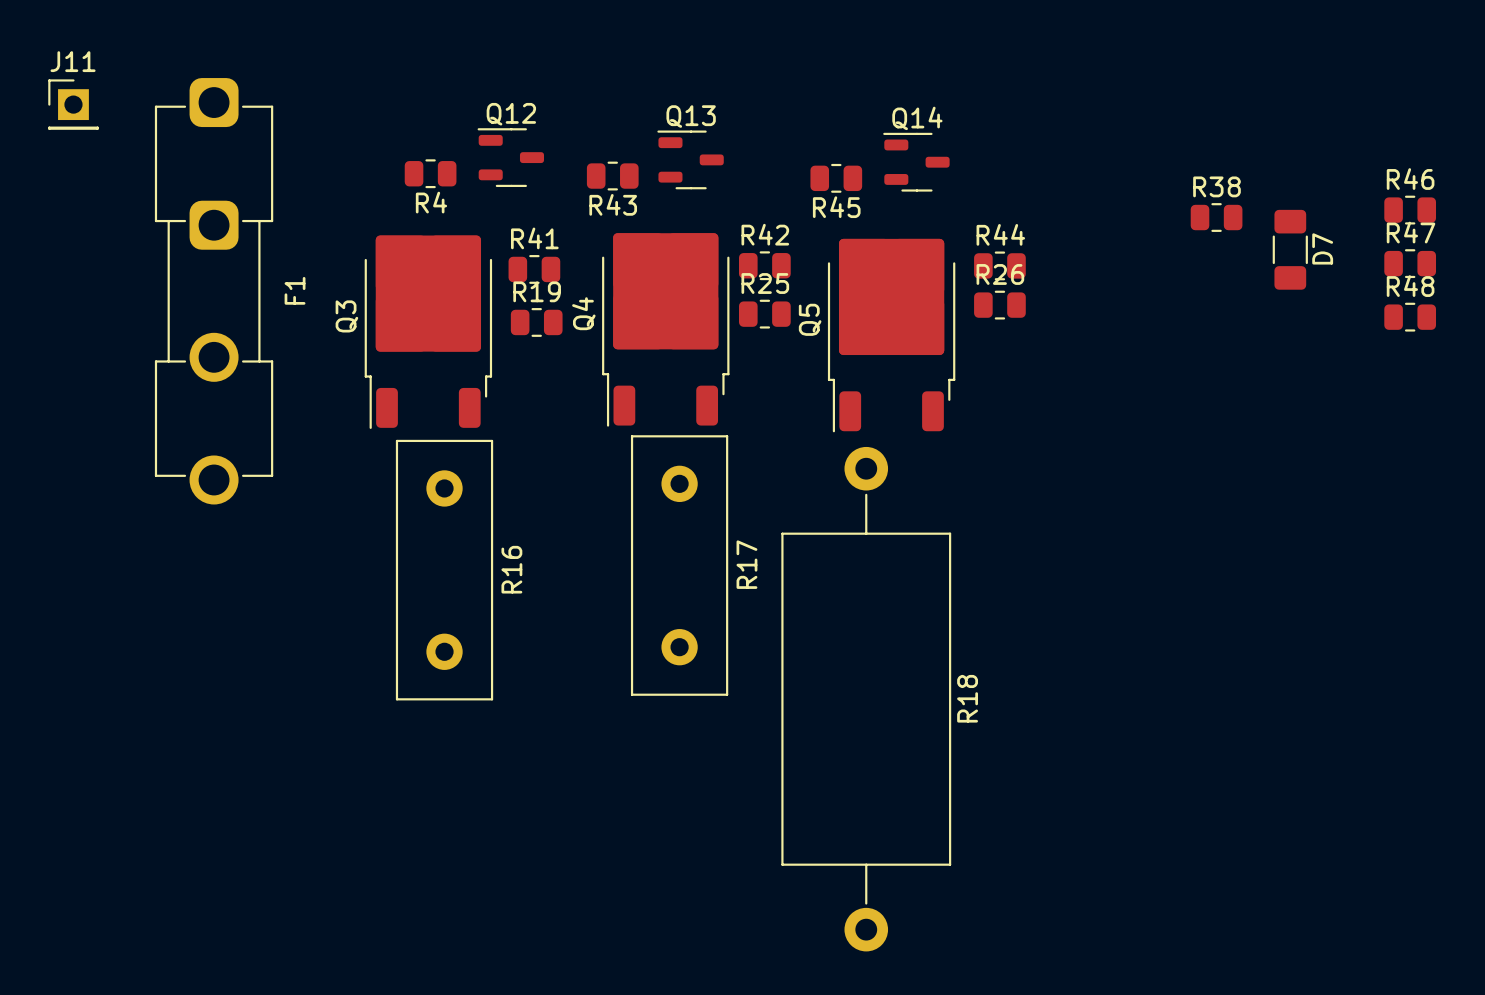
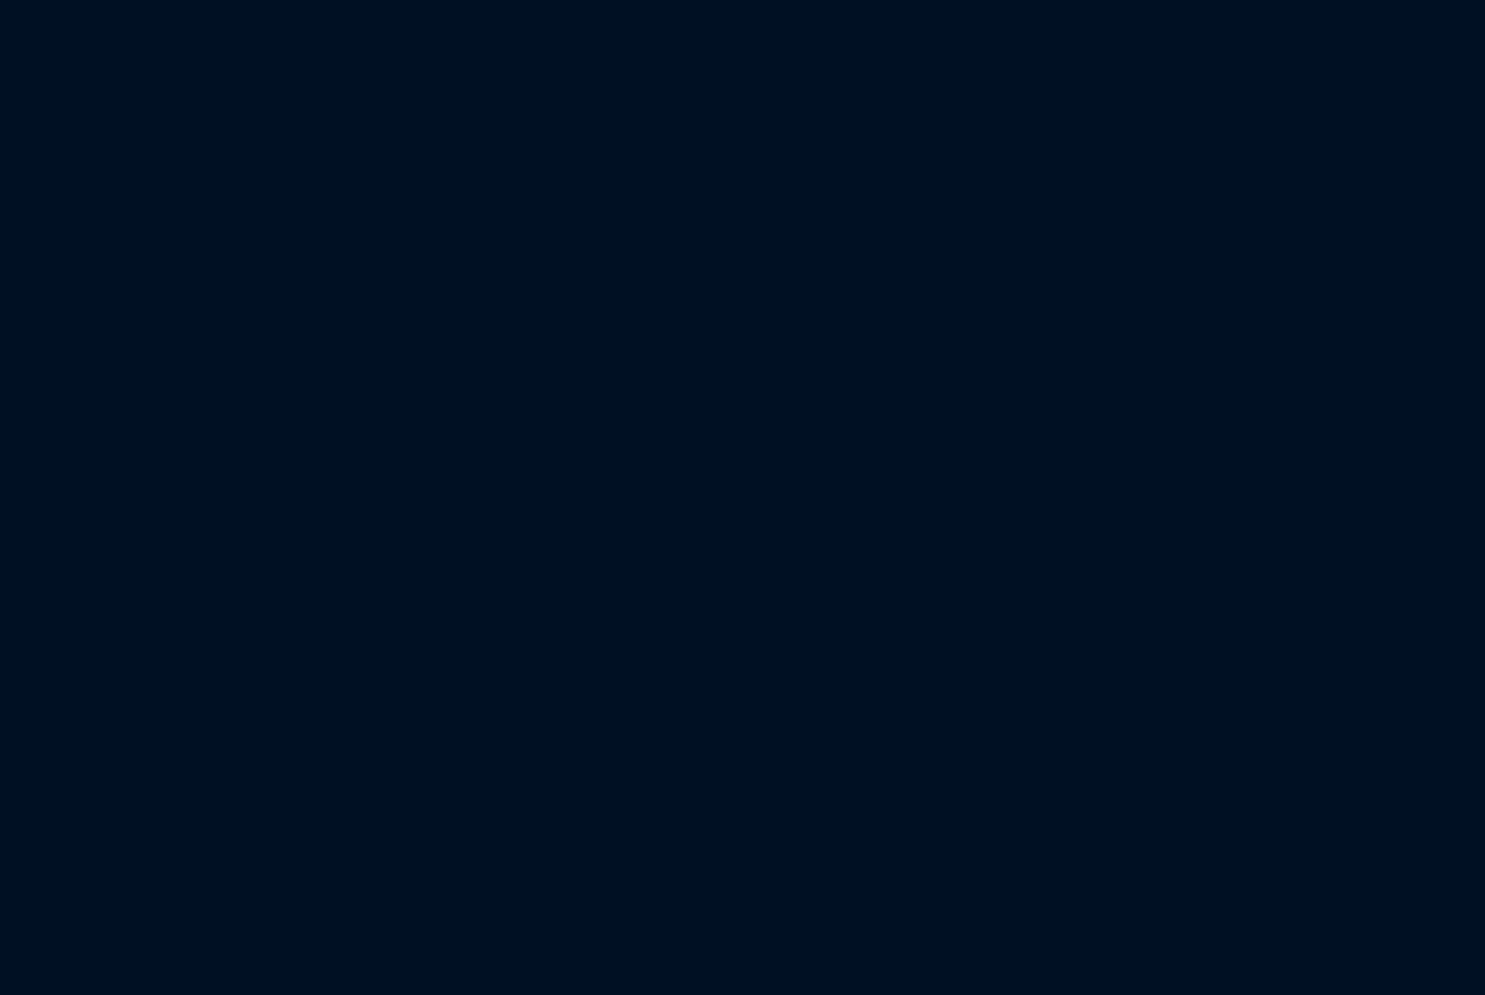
J11: (73, 104) -> none
Q12: (510, 157) -> none
Q13: (690, 159) -> none
Q14: (916, 162) -> none
R4: (430, 173) -> none
R43: (612, 176) -> none
R45: (836, 178) -> none
R46: (1410, 210) -> none
R38: (1216, 217) -> none
D7: (1290, 249) -> none
R47: (1410, 263) -> none
R42: (764, 265) -> none
R44: (999, 265) -> none
R41: (534, 269) -> none
F1: (214, 291) -> none
R26: (999, 305) -> none
R25: (764, 314) -> none
R48: (1410, 317) -> none
R19: (536, 322) -> none
Q4: (665, 329) -> none
Q3: (428, 332) -> none
Q5: (891, 335) -> none
R17: (679, 565) -> none
R16: (444, 570) -> none
R18: (866, 699) -> none

